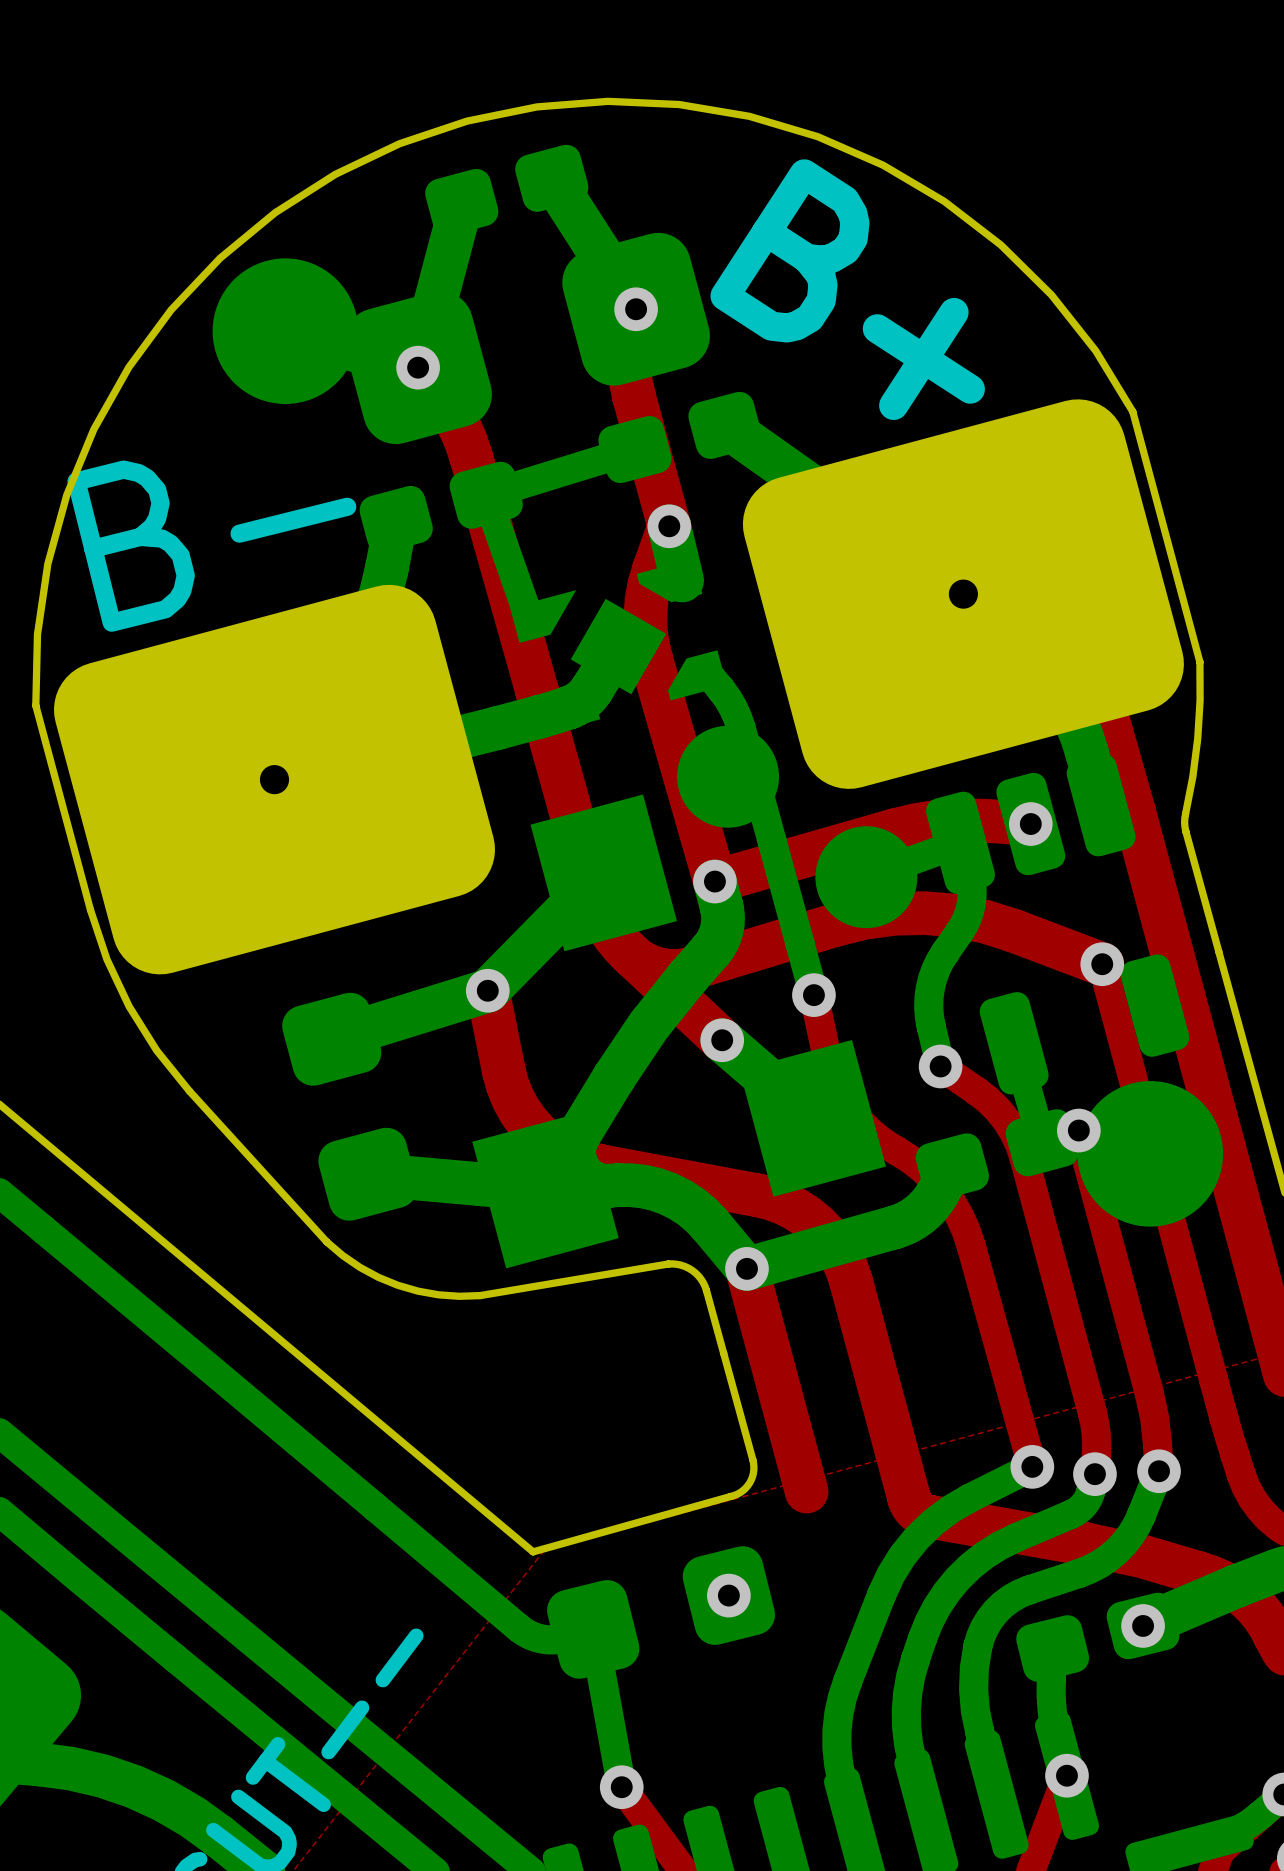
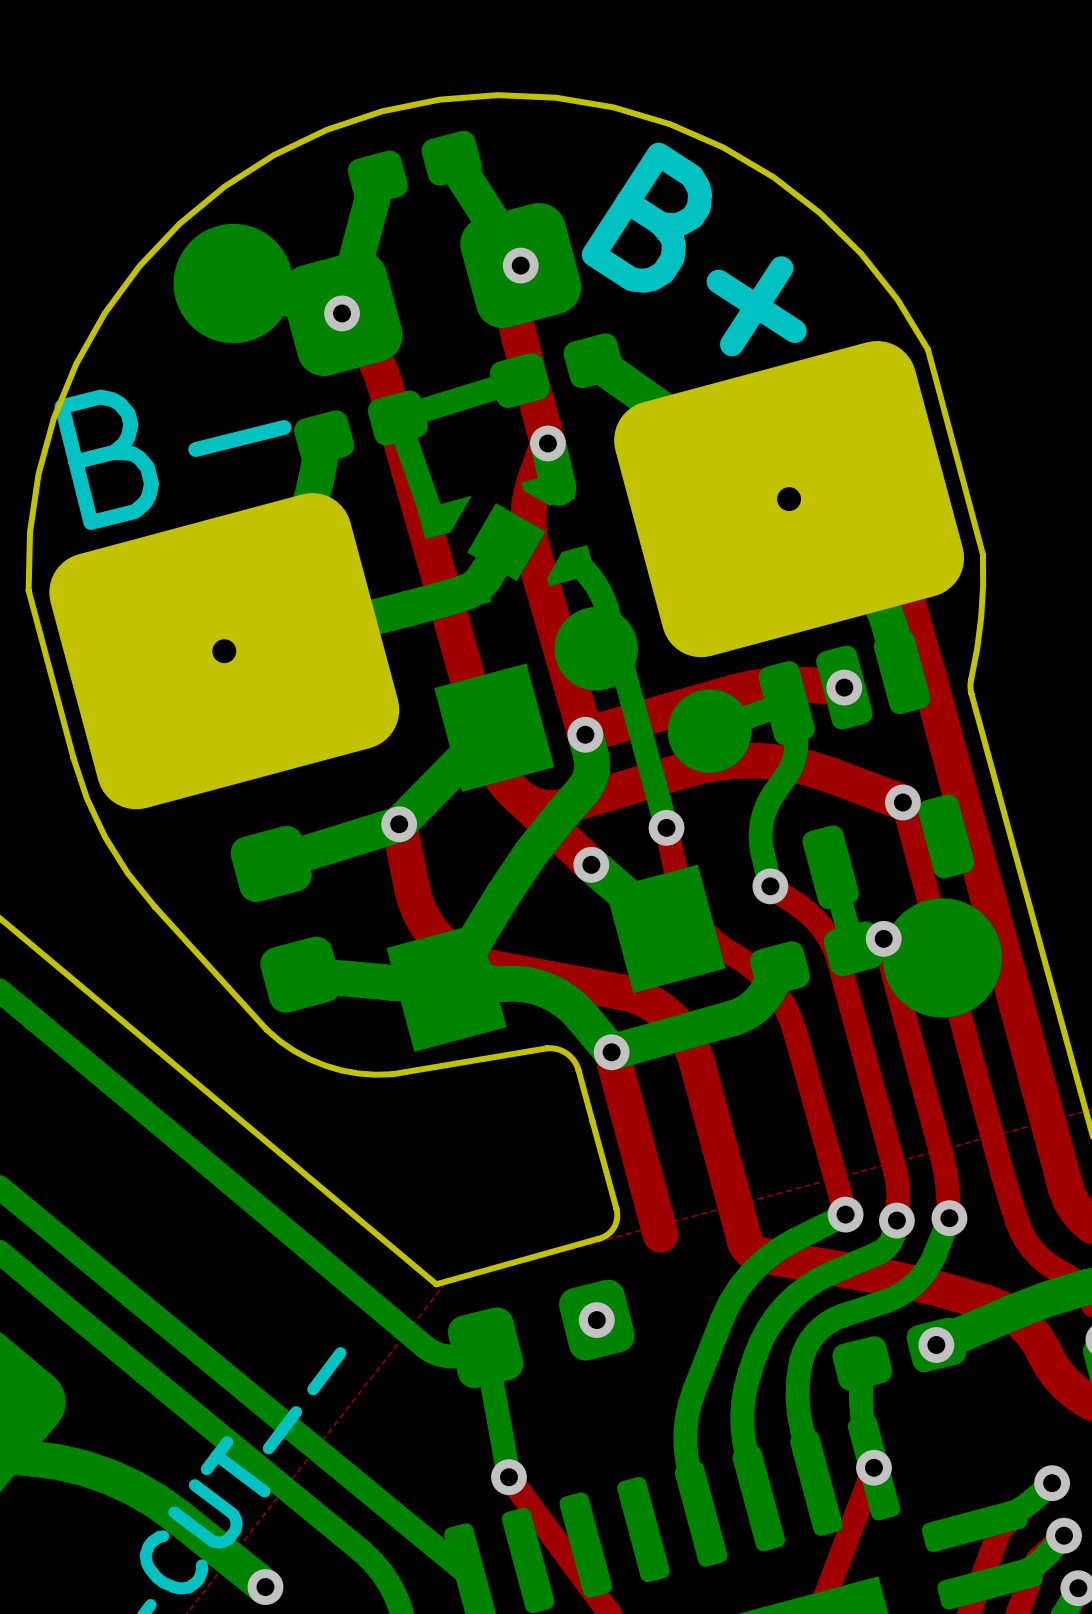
part footprint: [53, 399, 1184, 975] -> [49, 340, 965, 810]

